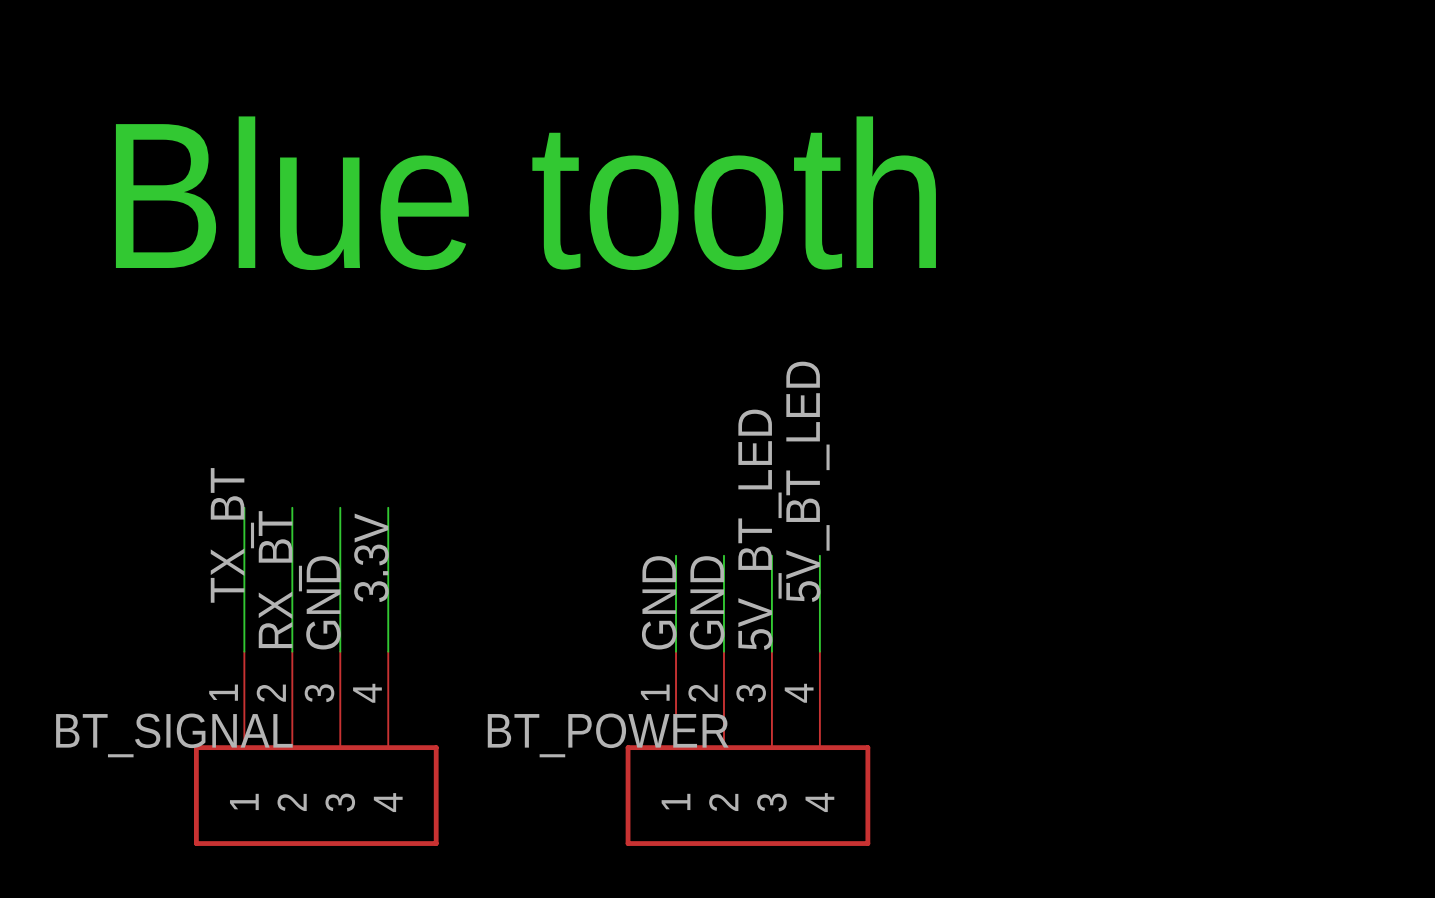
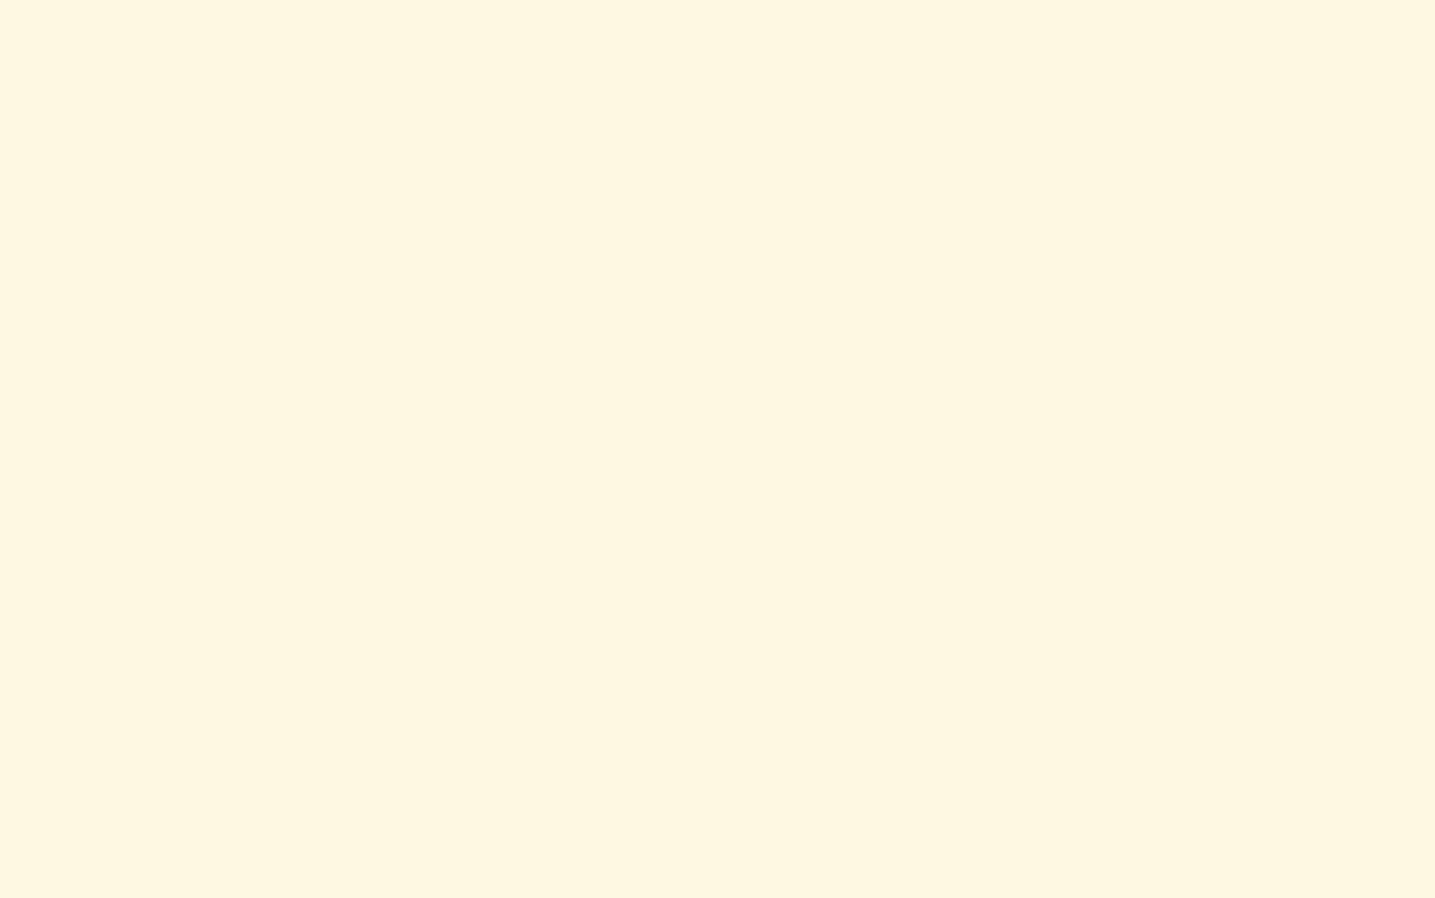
text: Blue tooth (525, 193) -> none
label: 5V_BT_LED (807, 481) -> none
wire: (244, 507) (244, 651) -> none
wire: (292, 507) (292, 651) -> none
wire: (340, 507) (340, 651) -> none
wire: (388, 507) (388, 651) -> none
label: 5V_BT_LED (760, 529) -> none
label: TX_BT (232, 535) -> none
wire: (676, 555) (676, 651) -> none
wire: (723, 555) (723, 651) -> none
wire: (771, 555) (771, 651) -> none
wire: (819, 555) (819, 651) -> none
label: 3.3V (371, 557) -> none
label: RX_BT (280, 579) -> none
label: GND (323, 602) -> none
label: GND (659, 602) -> none
label: GND (707, 602) -> none
BT_SIGNAL: (316, 748) -> none
BT_POWER: (747, 748) -> none

